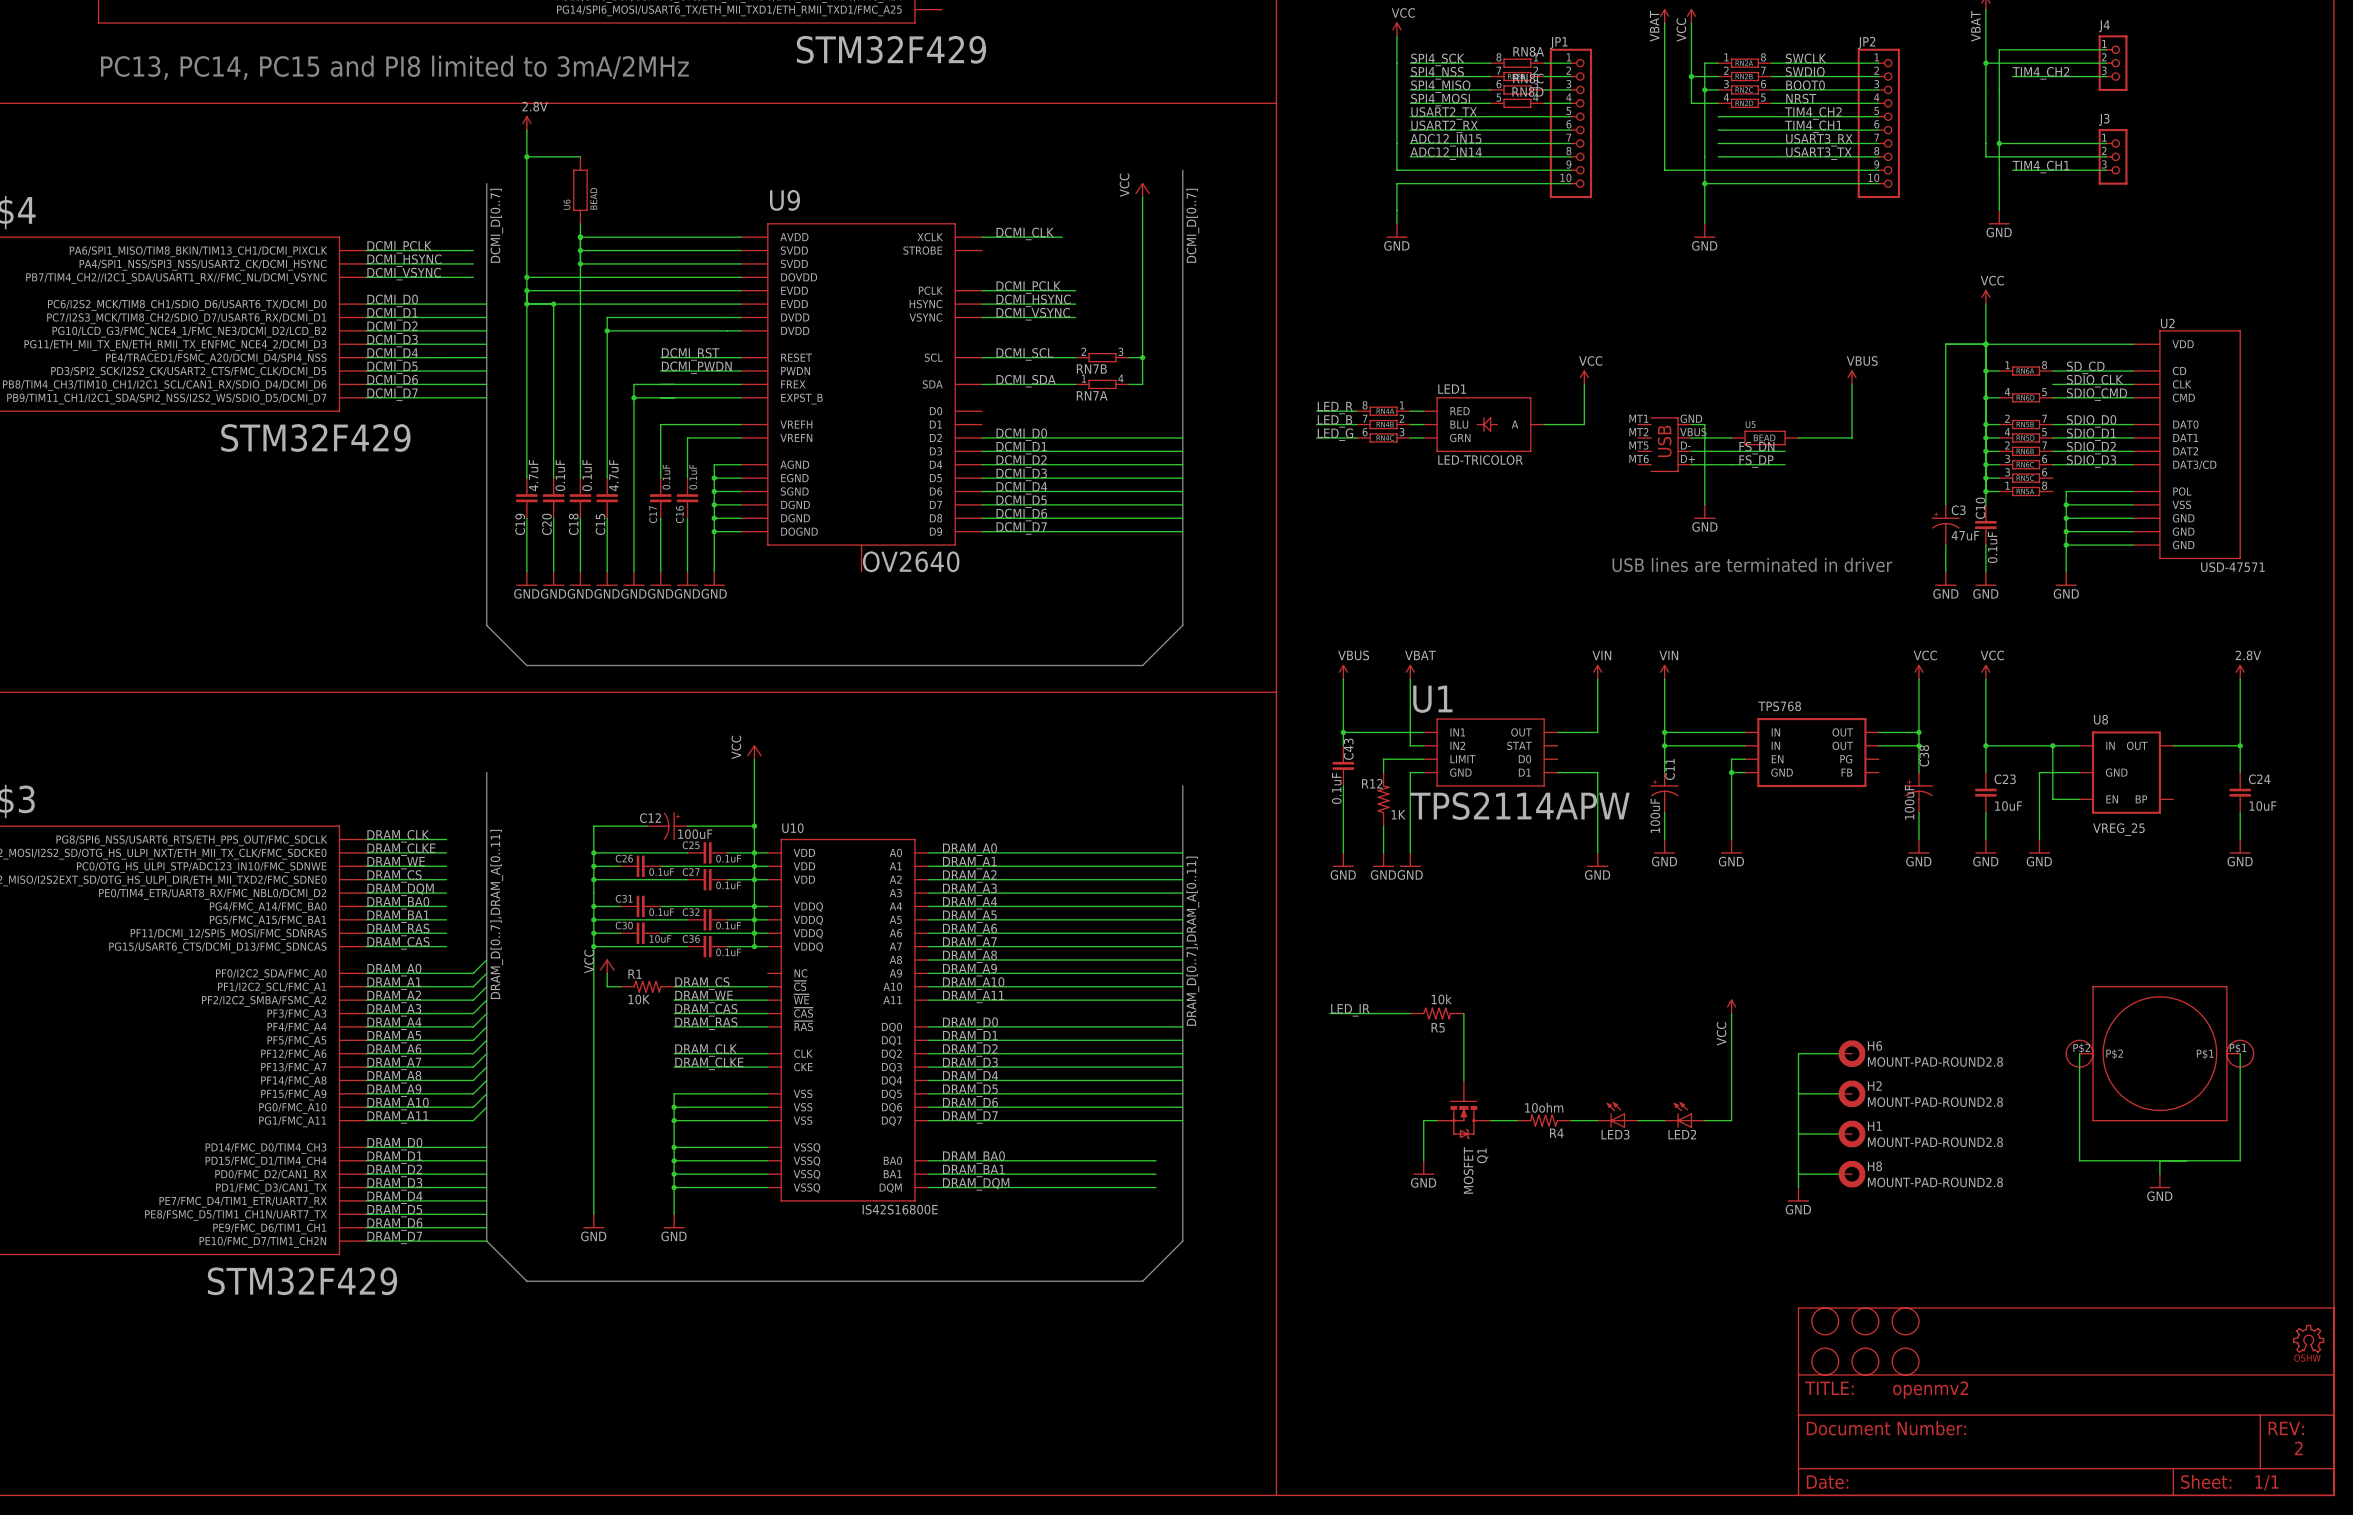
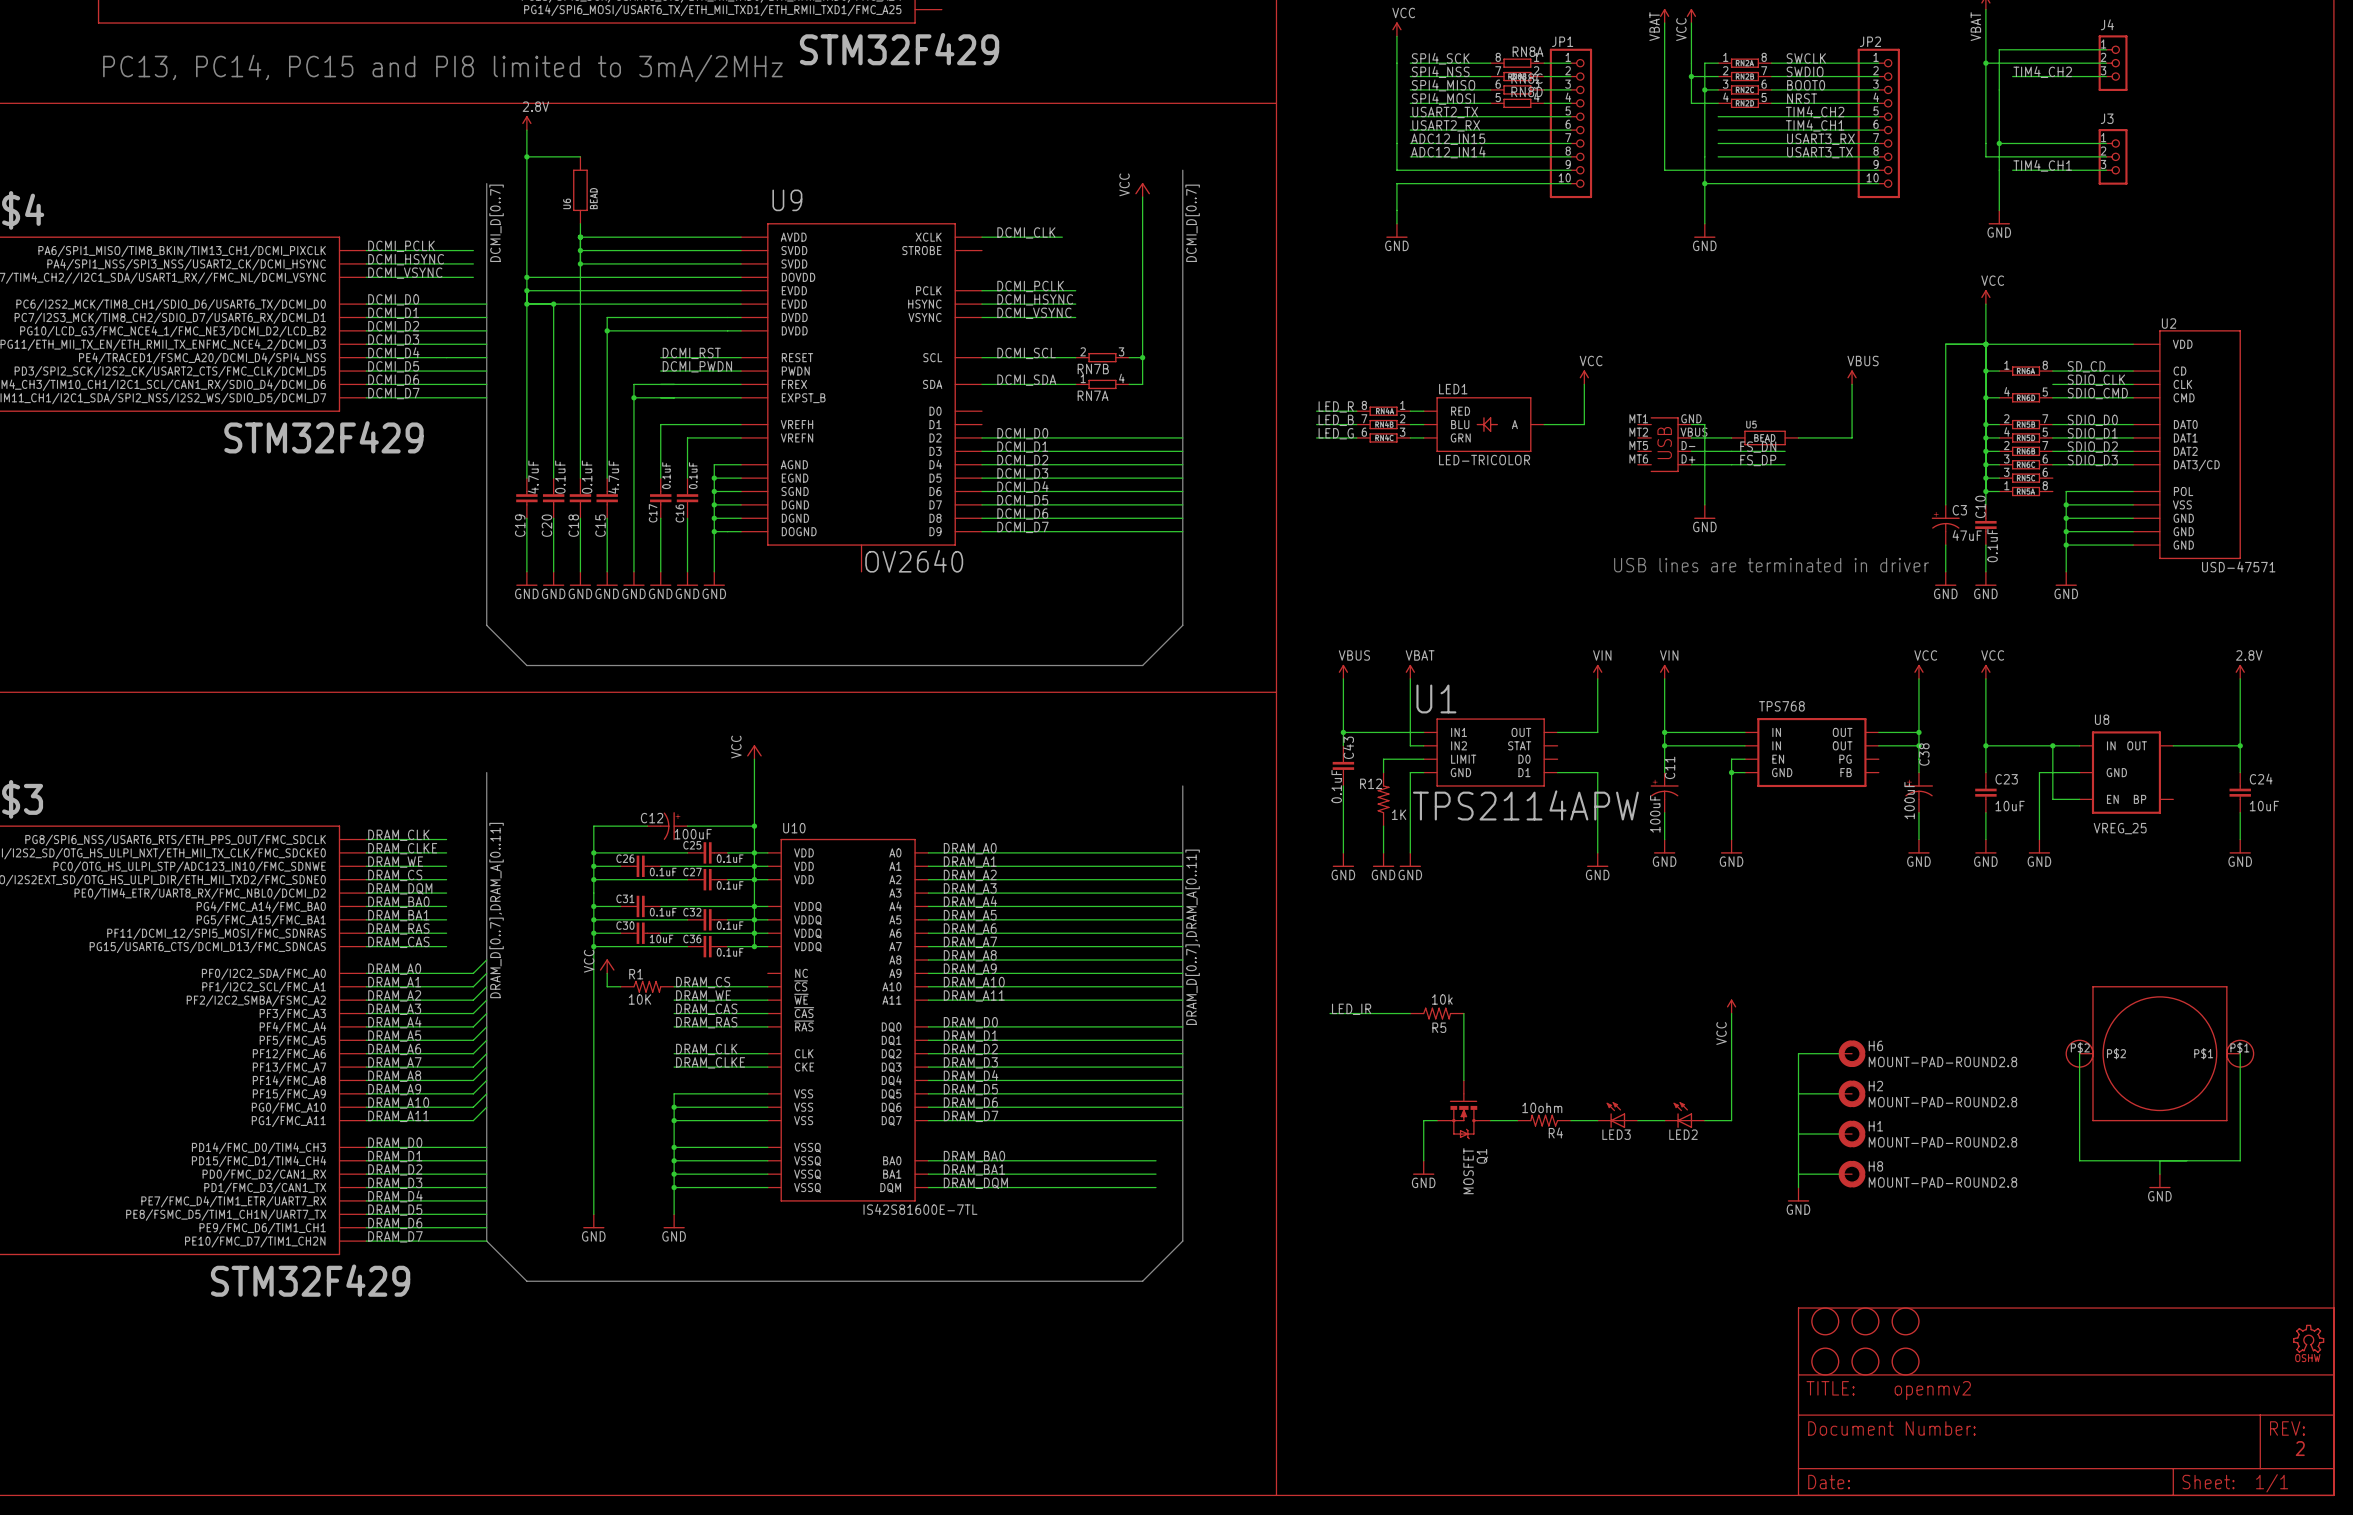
U10 value: IS42S16800E (900, 1209) -> IS42S81600E-7TL (920, 1209)

